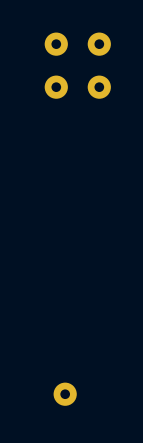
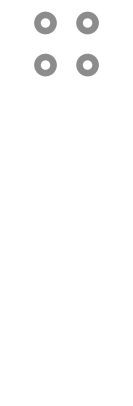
part: (65, 394) -> none

